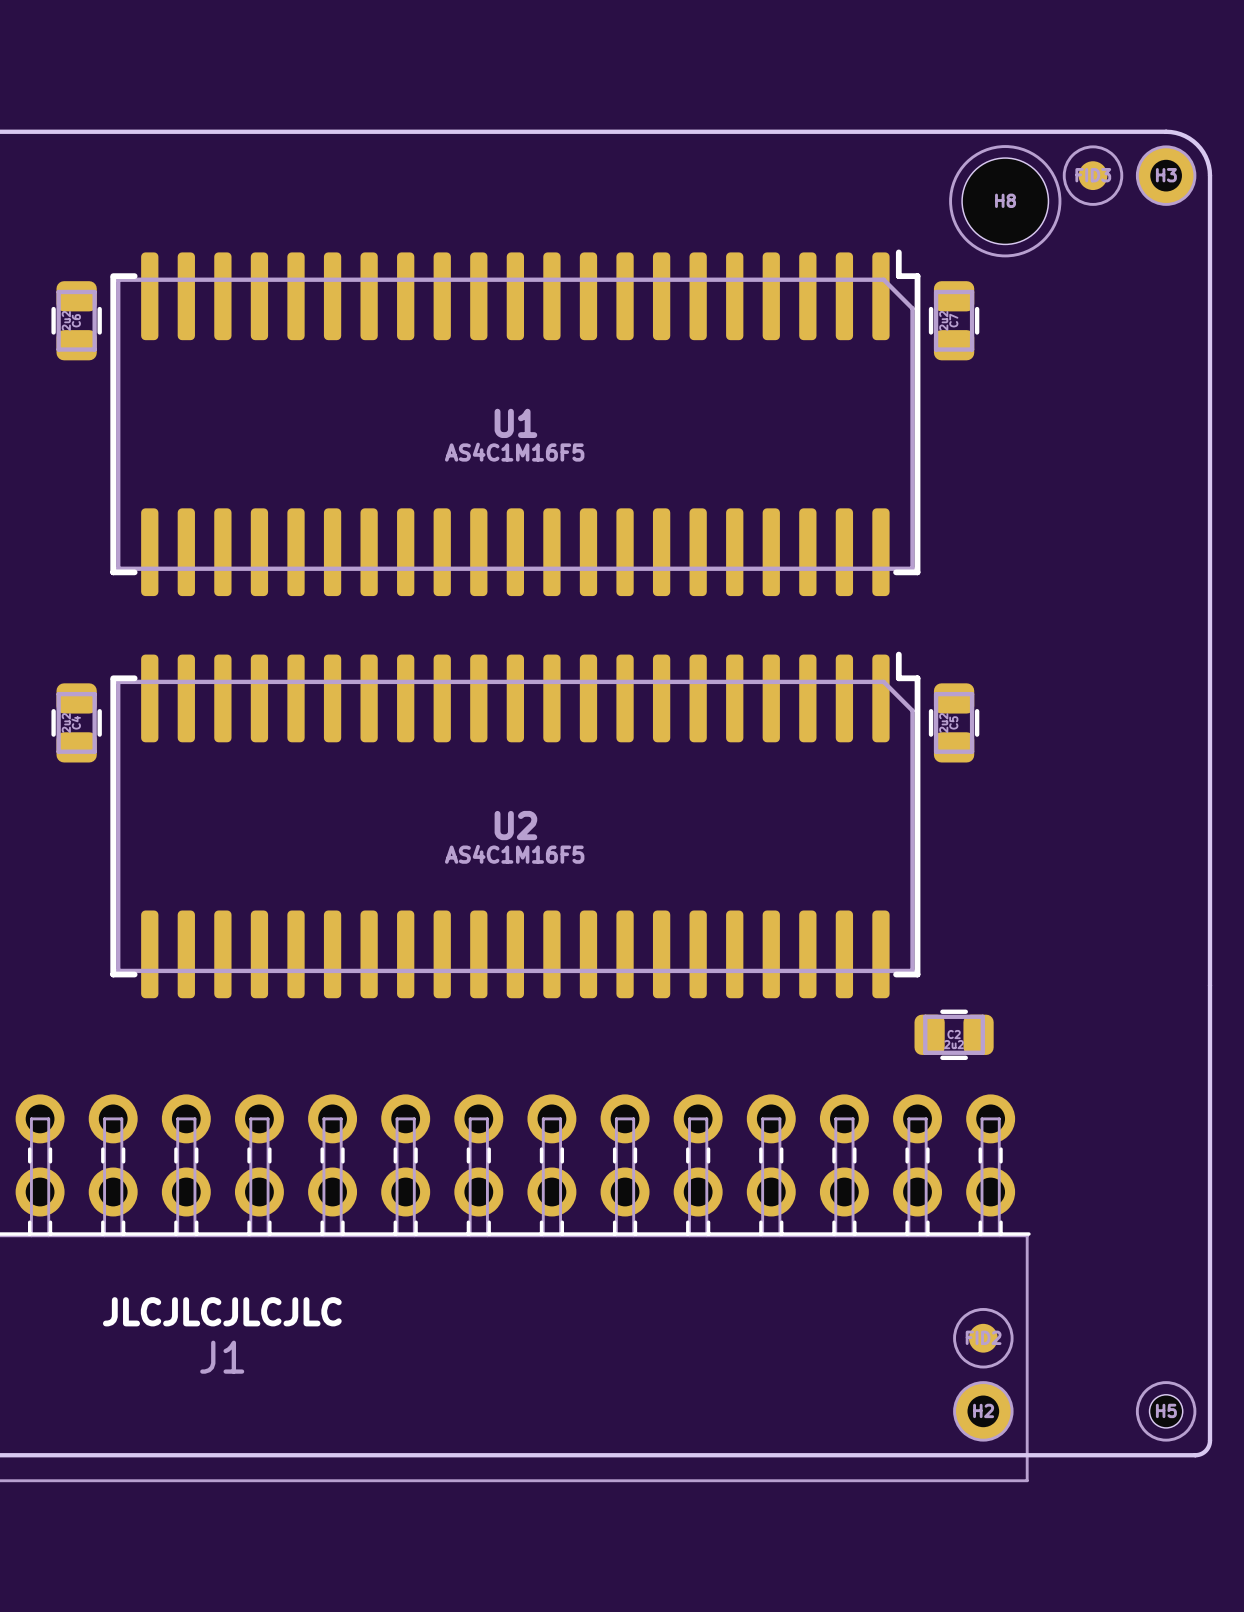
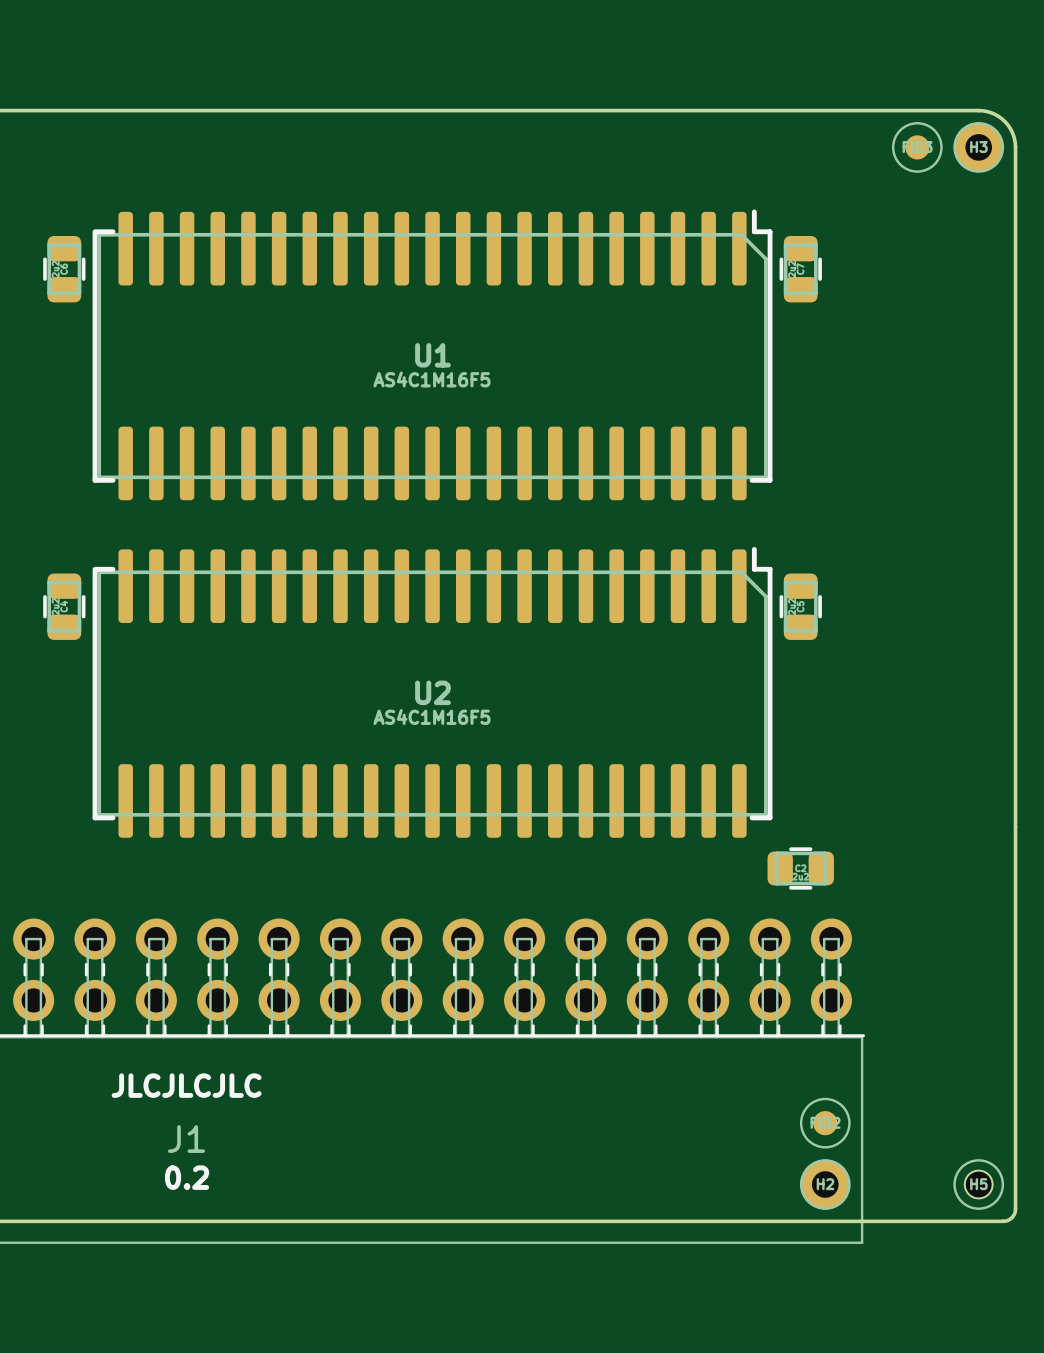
H8: (1005, 201) -> none
text: JLCJLCJLCJLC (222, 1311) -> JLCJLCJLC (186, 1085)
text: none -> 0.2 (187, 1177)

